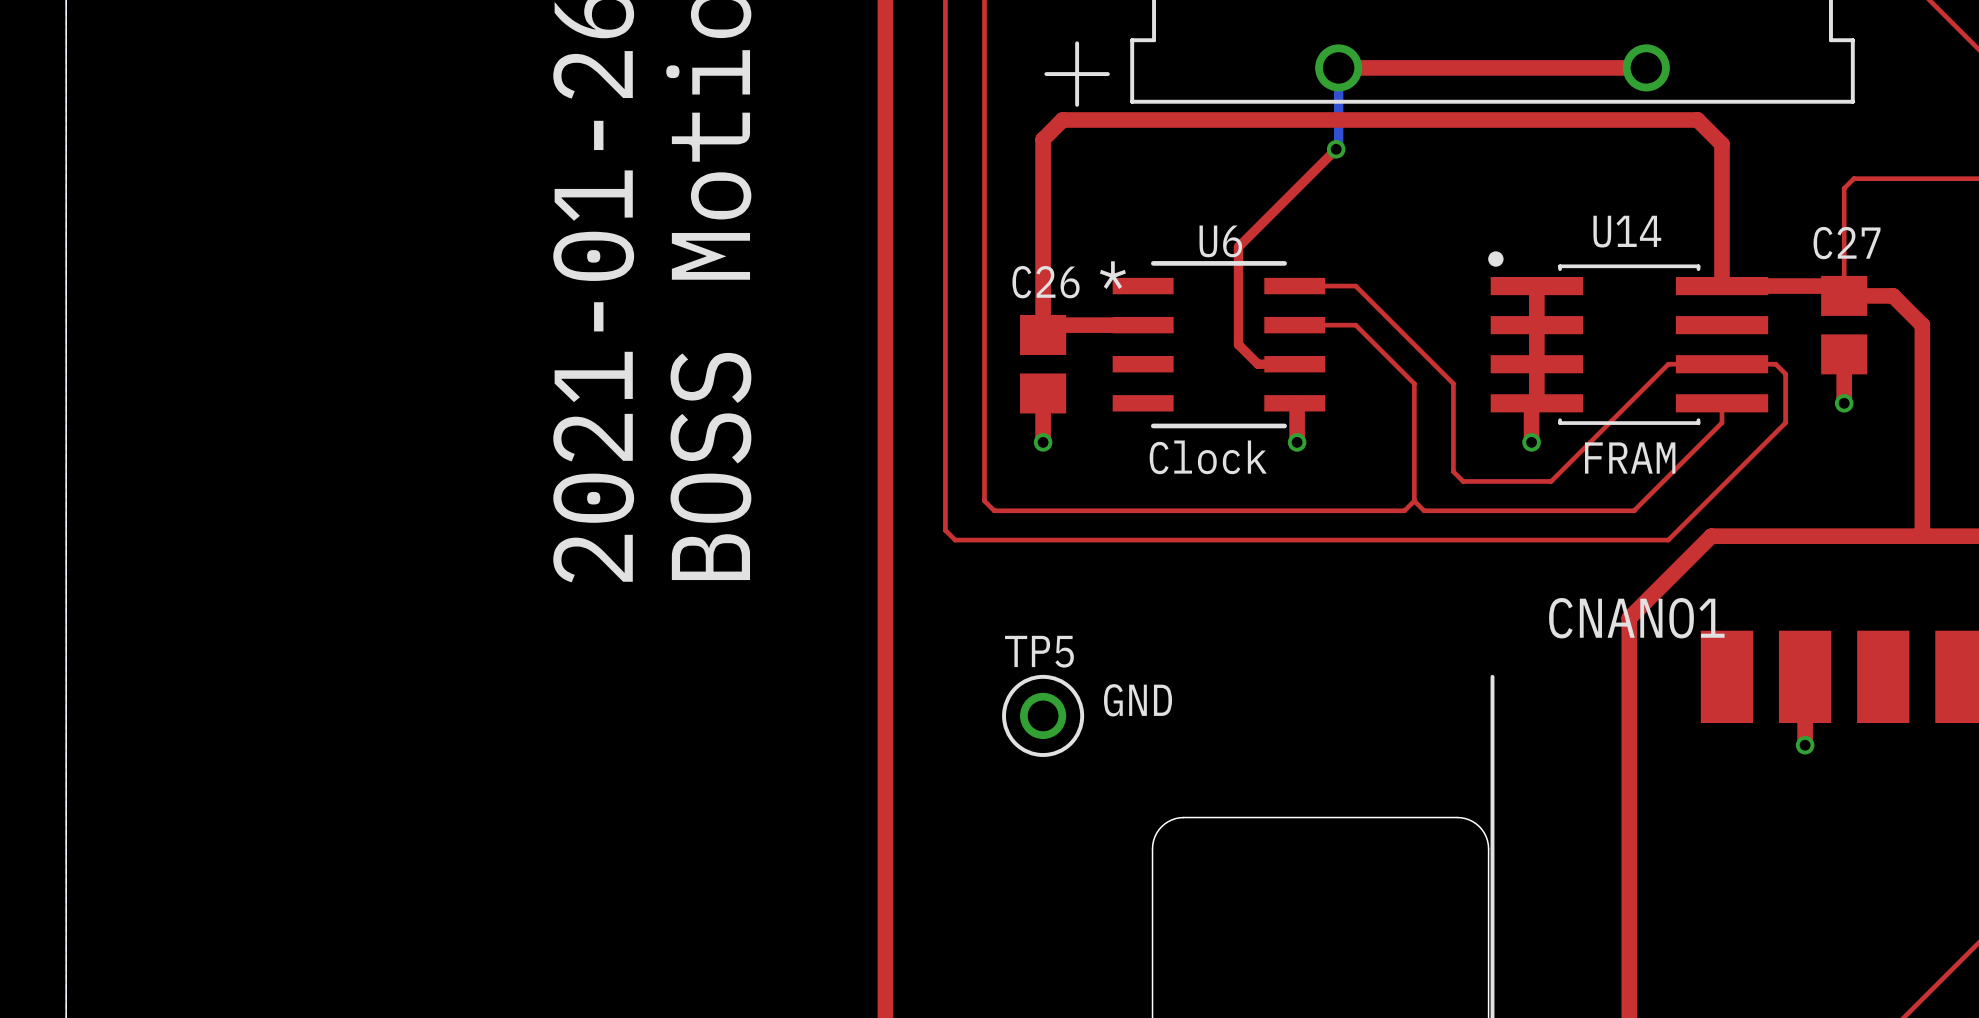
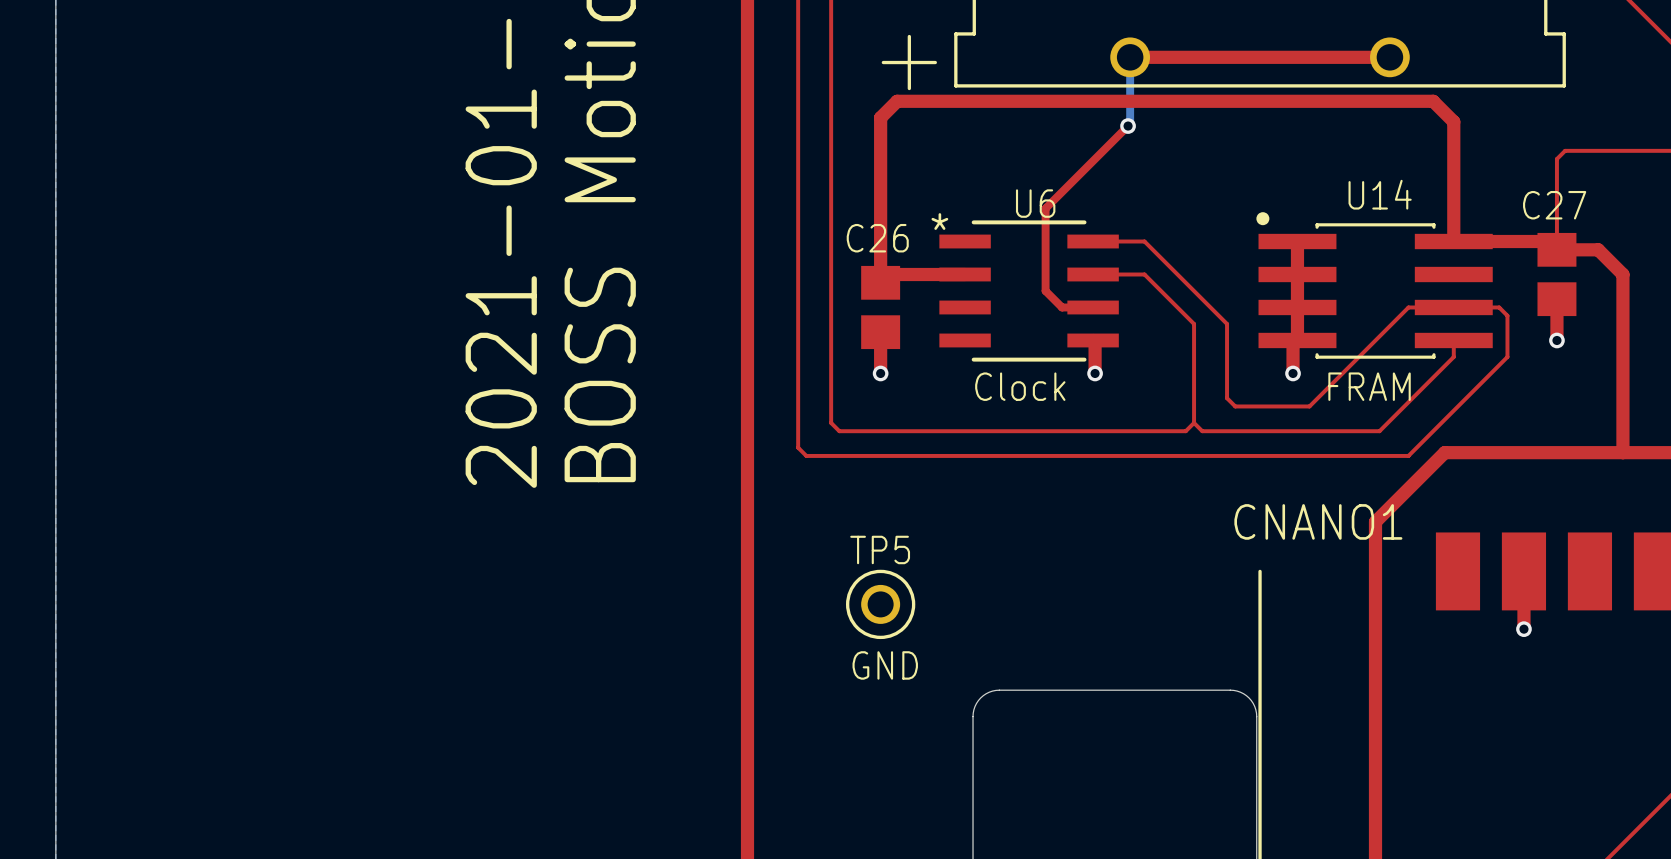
CNANO1 name position: CNANO1 (1636, 618) -> CNANO1 (1318, 521)
text position: GND (1138, 700) -> GND (885, 665)

